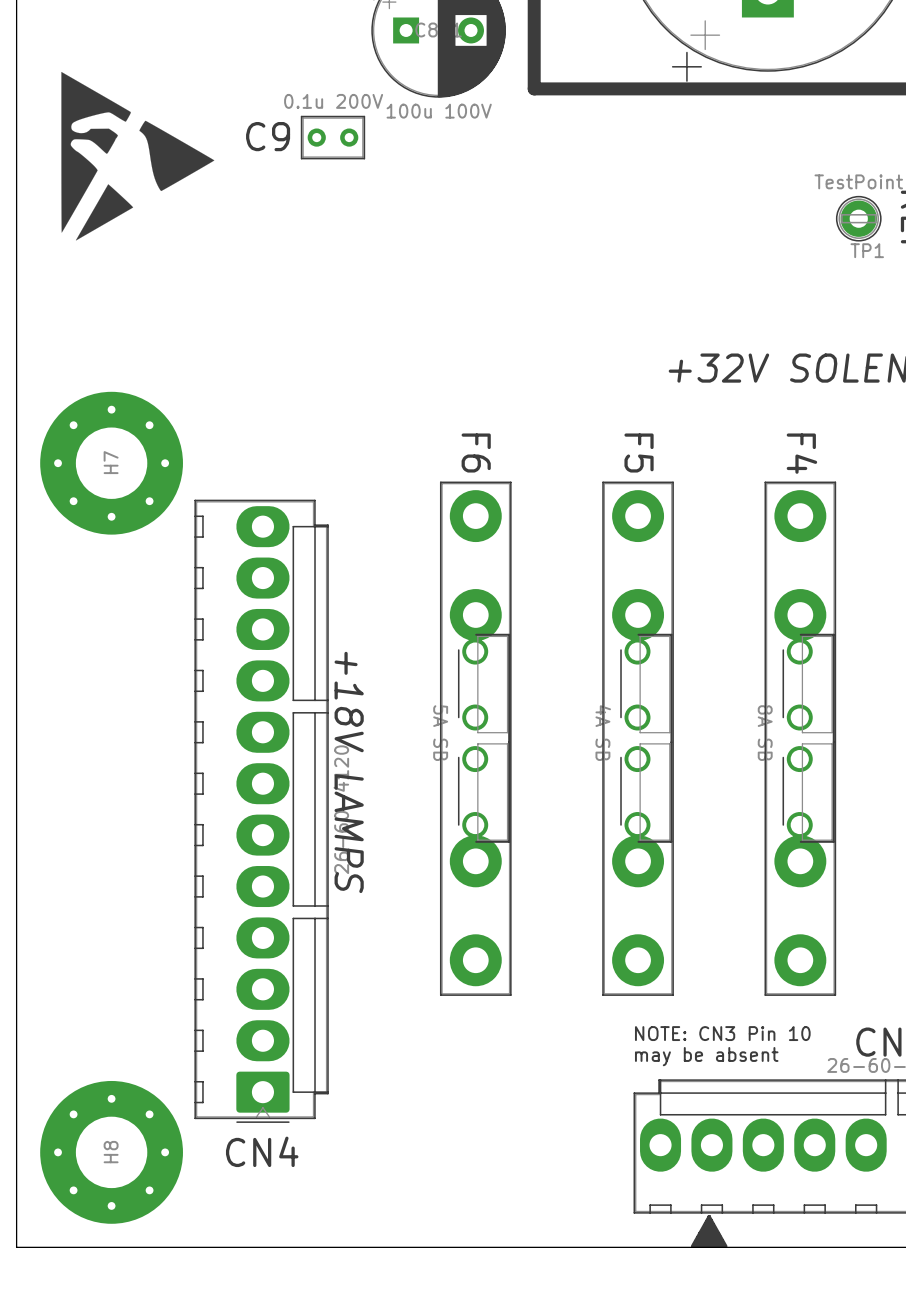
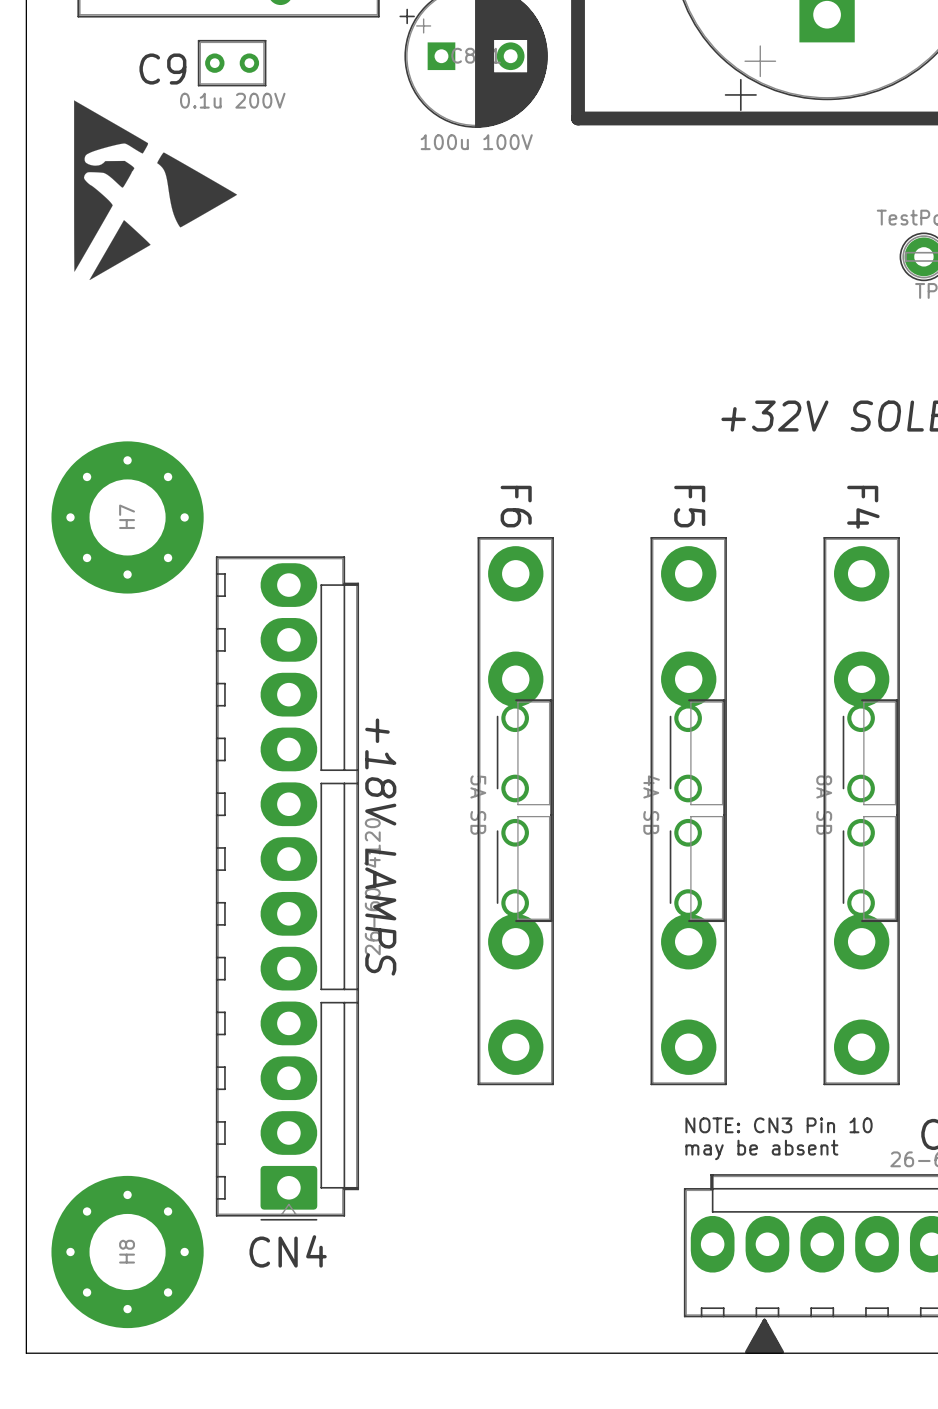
C9 value position: 0.1u 200V (333, 101) -> 0.1u 200V (232, 100)
C9 name position: C9 (268, 136) -> C9 (162, 69)
C9 position: (332, 137) -> (232, 63)

